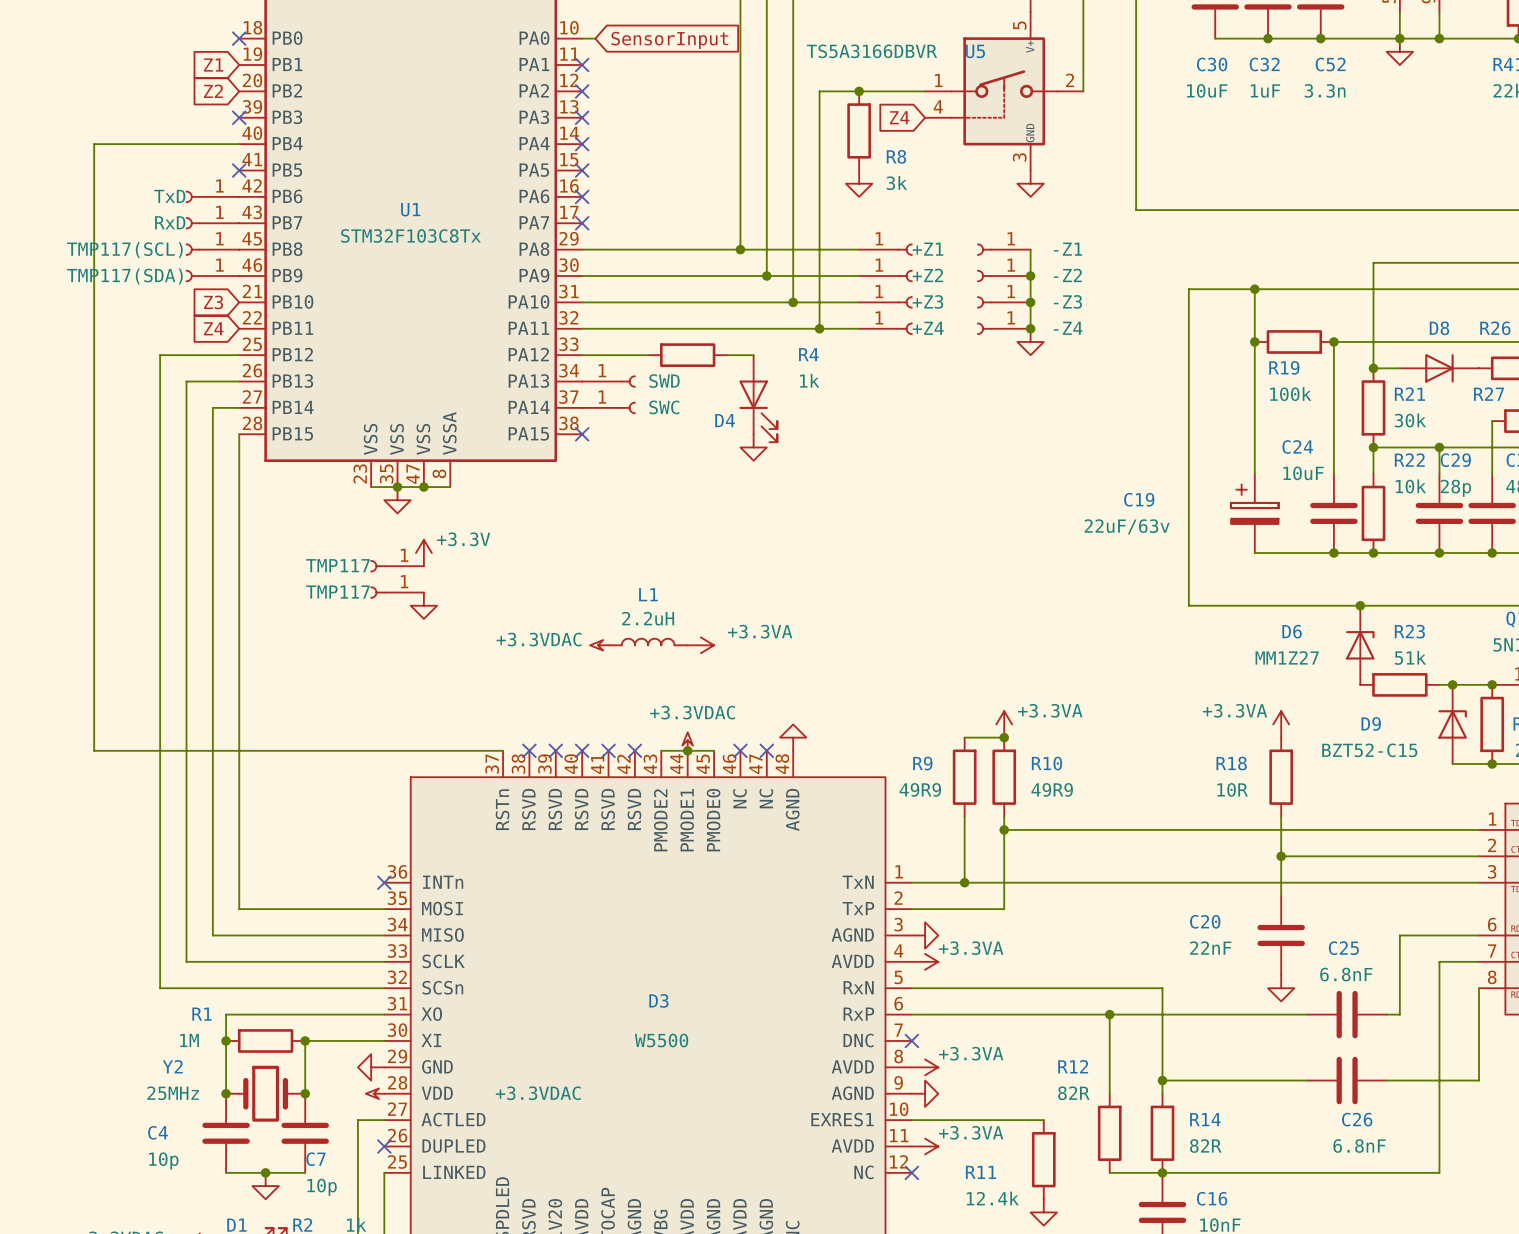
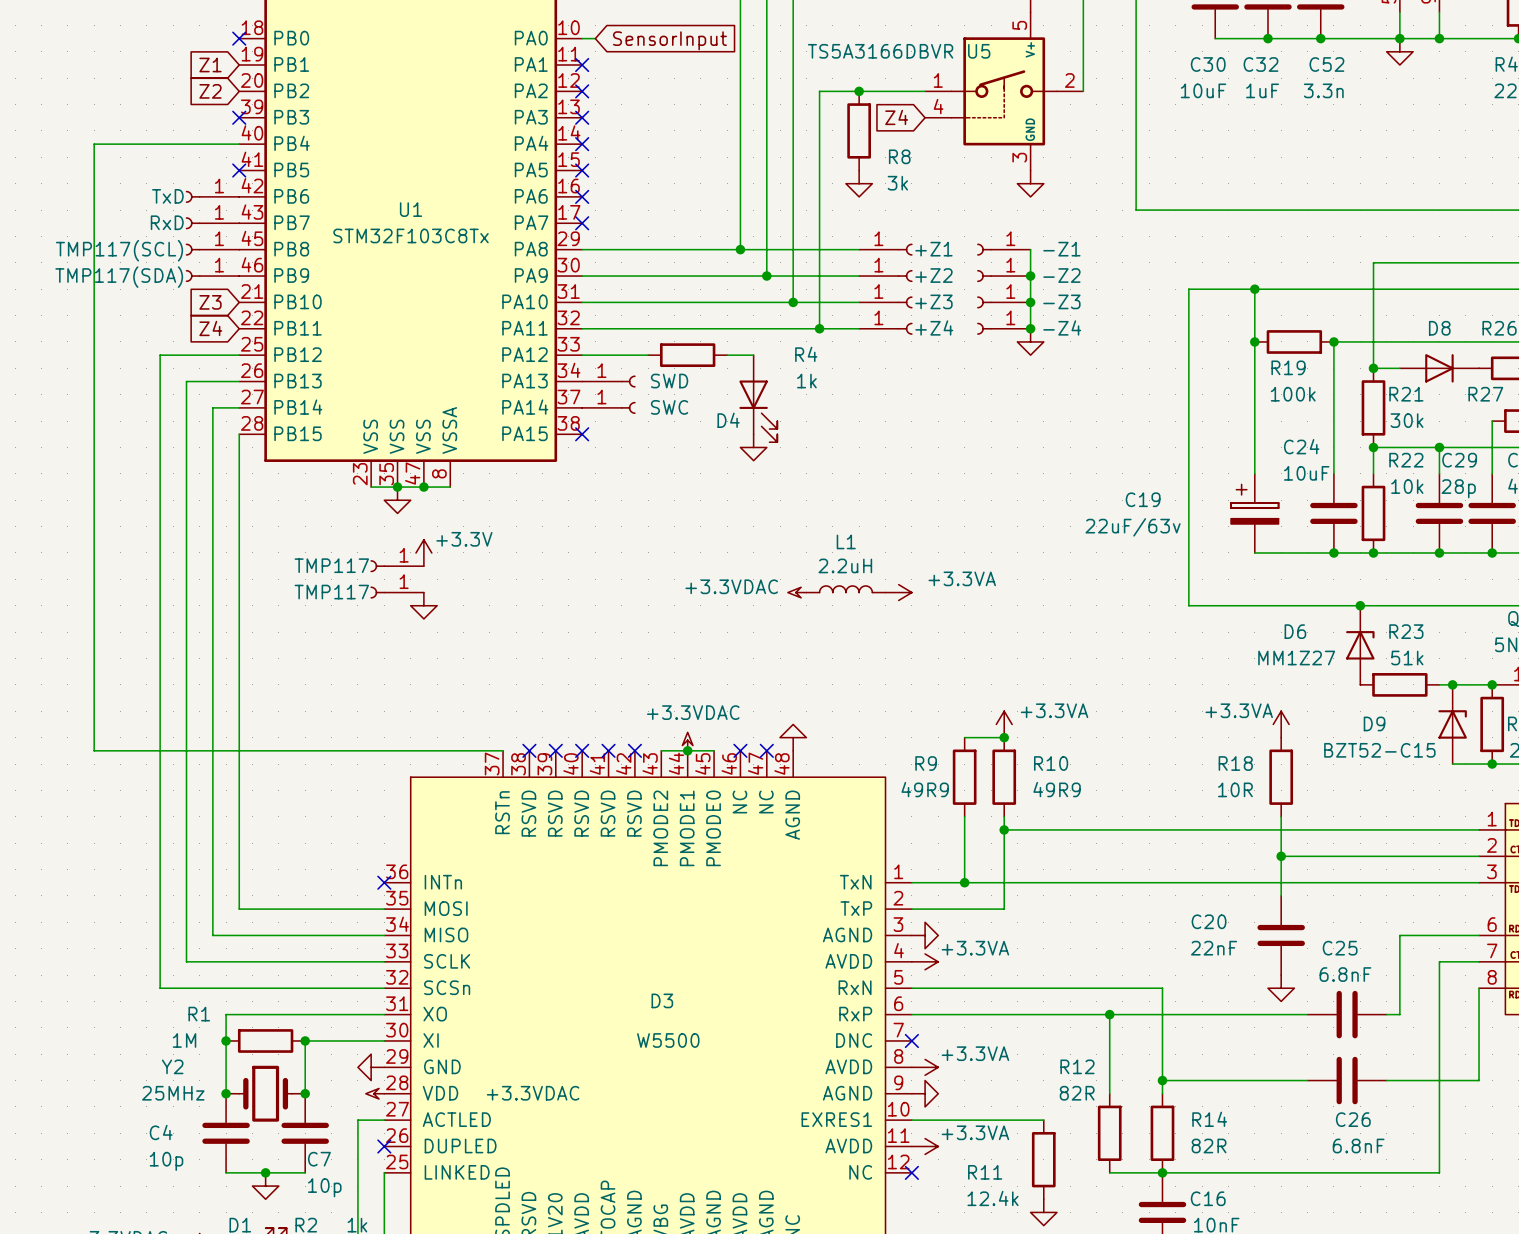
L1 position: (648, 642) -> (845, 589)
power symbol position: +3.3VDAC (599, 645) -> +3.3VDAC (797, 592)
power symbol position: +3.3VA (700, 645) -> +3.3VA (898, 592)

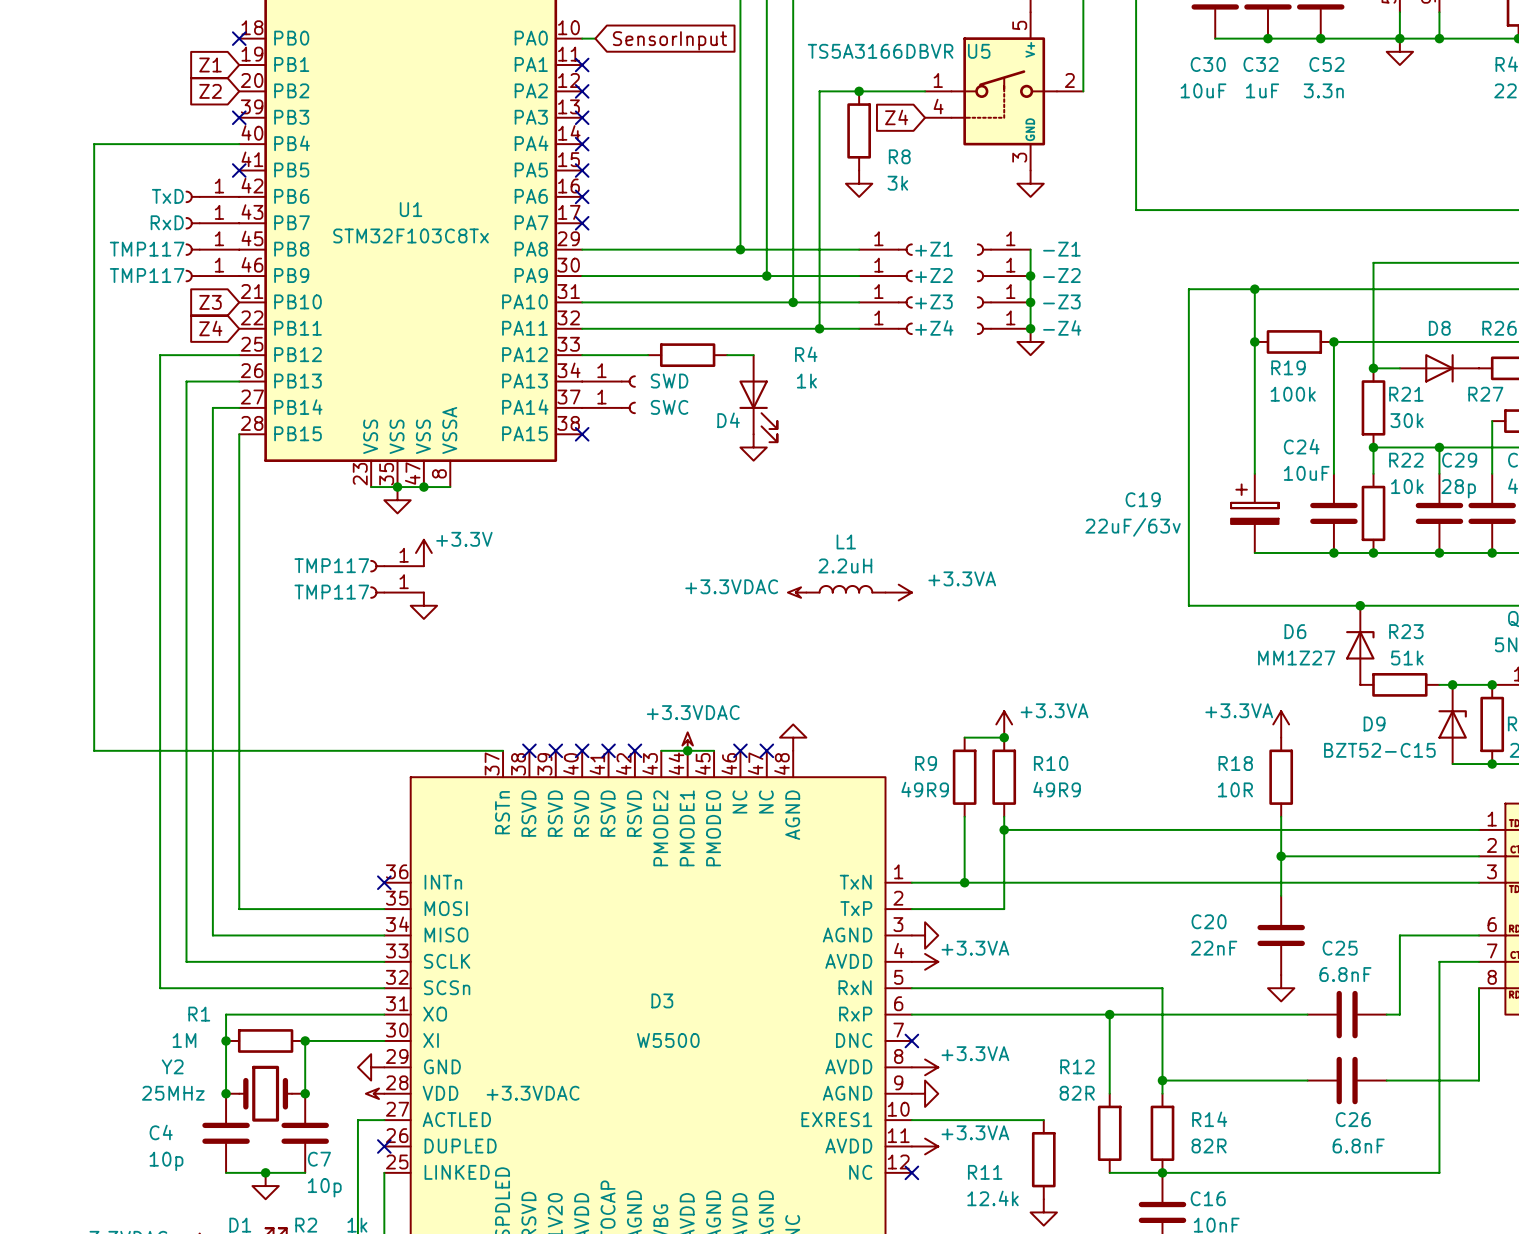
part value: TMP117(SCL) (119, 250) -> TMP117 (147, 249)
part value: TMP117(SDA) (119, 277) -> TMP117 (147, 275)

